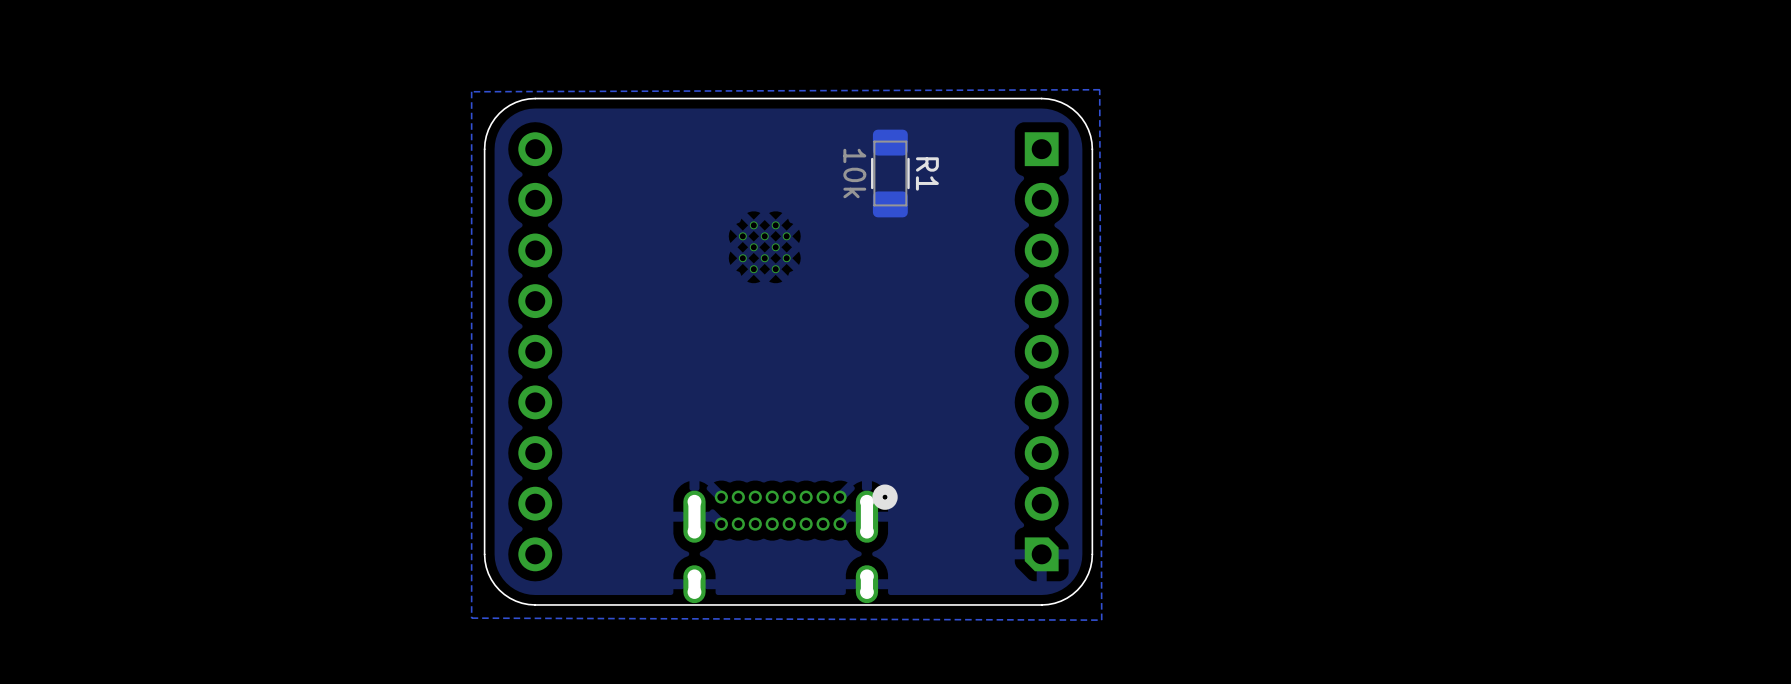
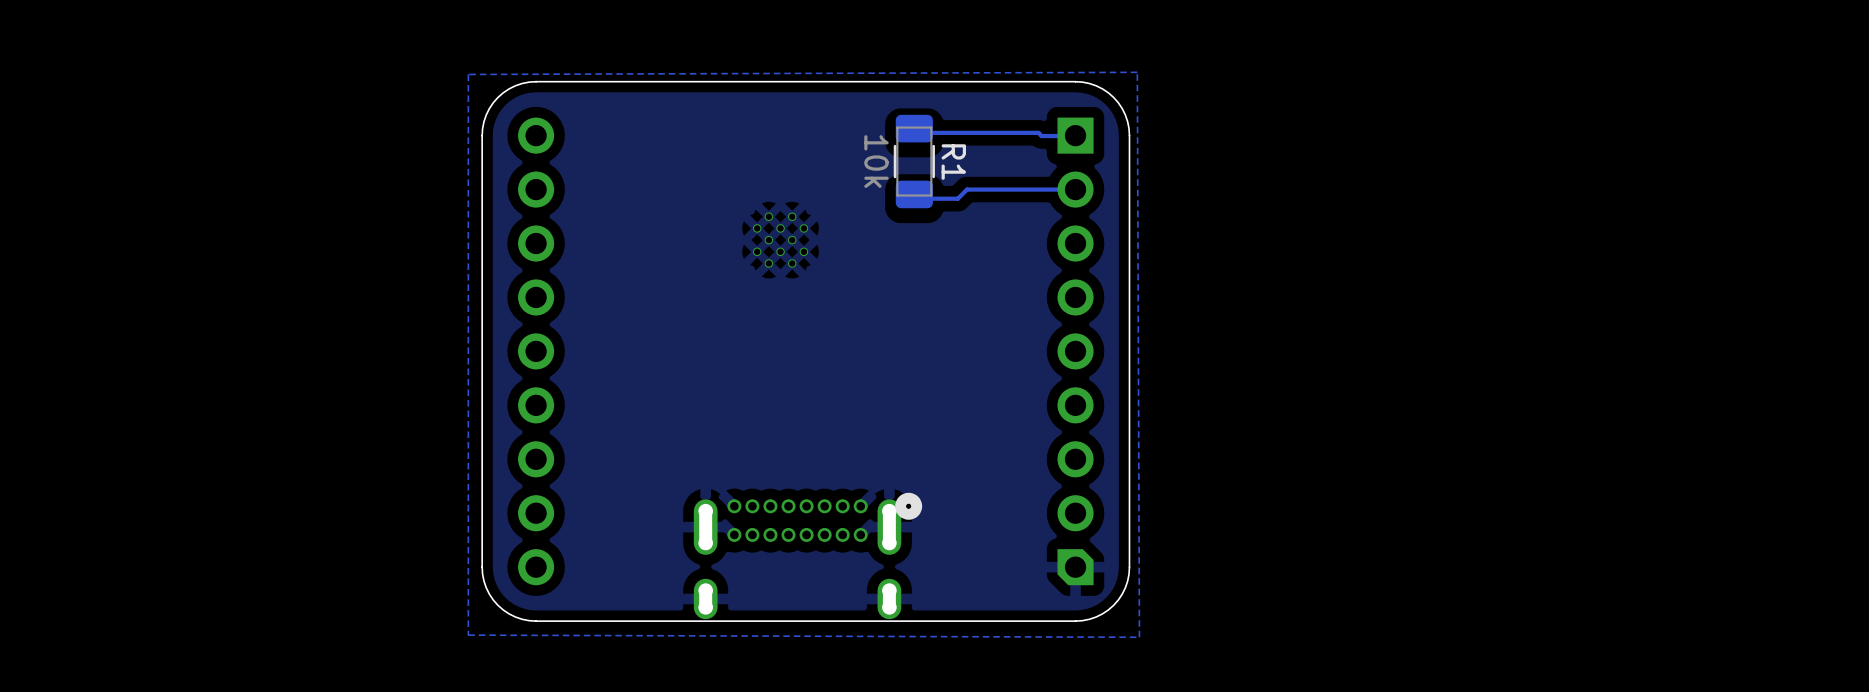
track: none -> (914, 132) (1038, 132) (1041, 136) (1075, 135)
track: none -> (1075, 189) (967, 189) (957, 198) (914, 198)

